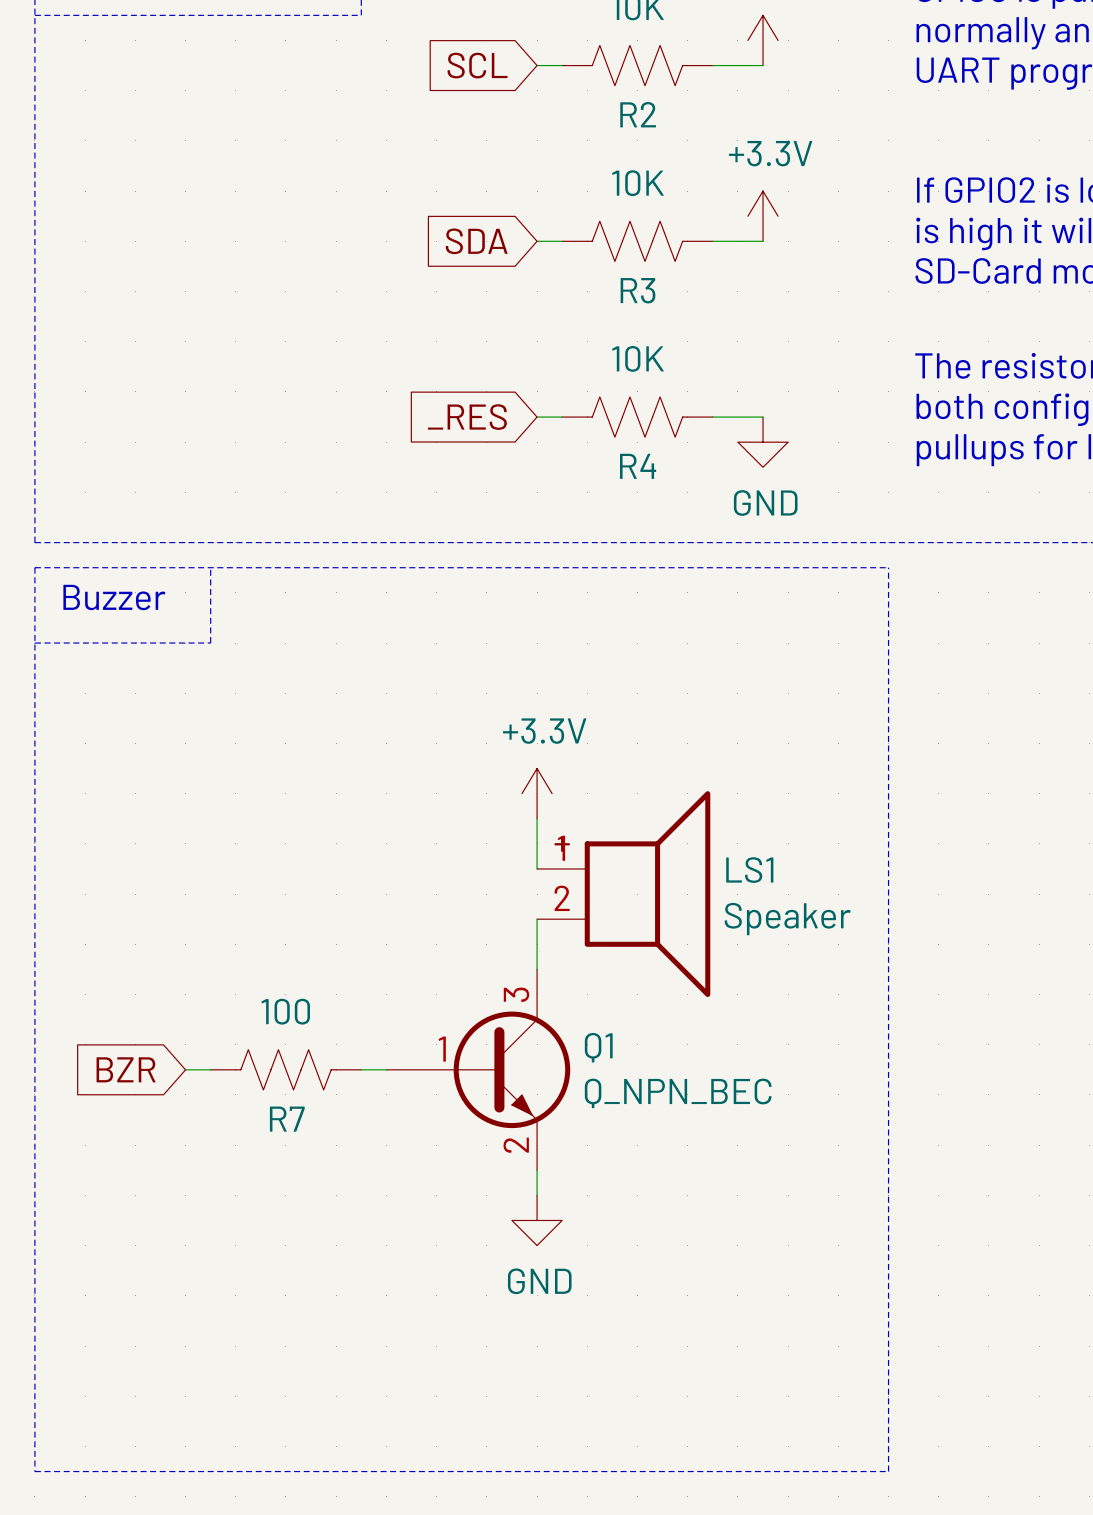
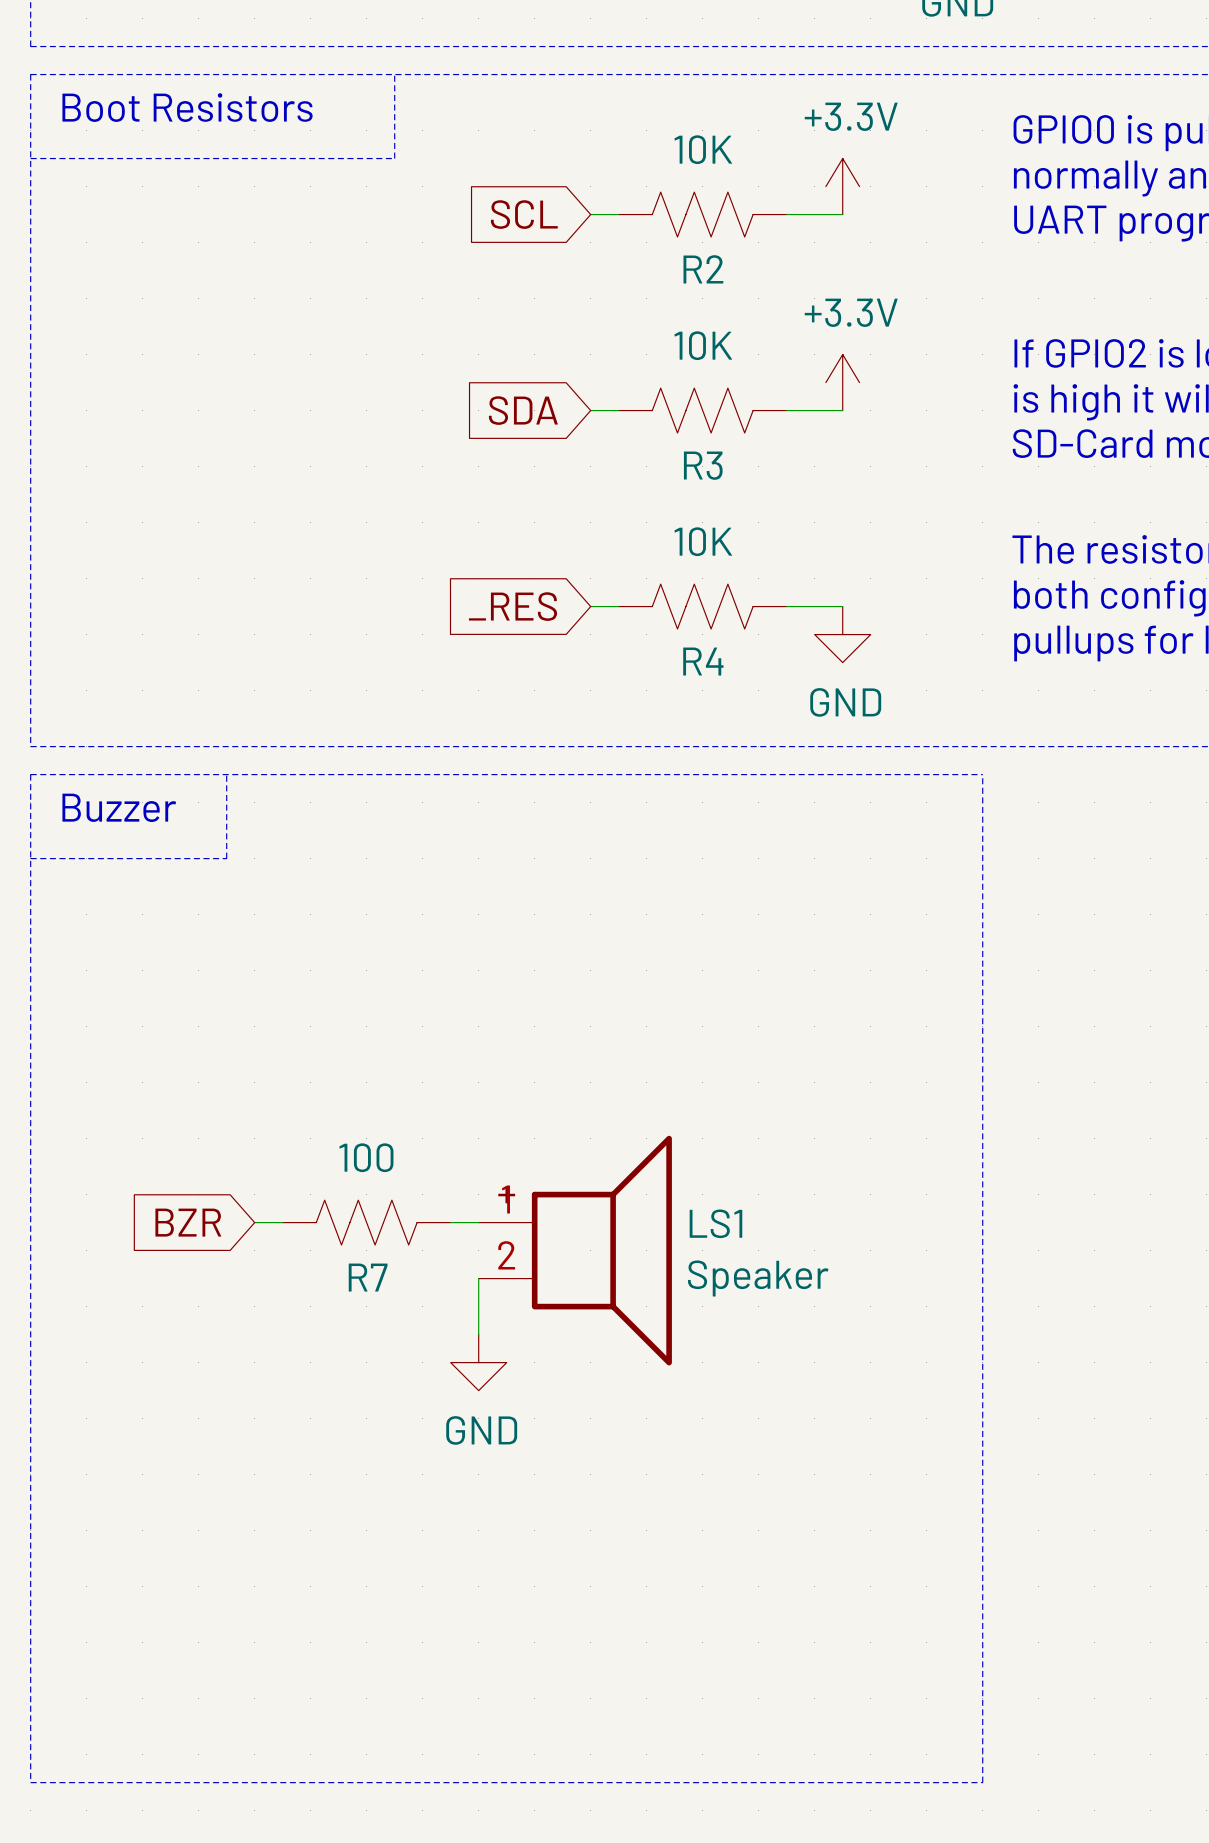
power symbol: +3.3V (537, 793) -> none
wire: (537, 818) (537, 868) -> none
LS1 position: (623, 894) -> (575, 1250)
wire: (537, 919) (537, 969) -> (478, 1278) (478, 1334)
global label position: BZR (126, 1069) -> BZR (188, 1222)
wire: (185, 1069) (210, 1069) -> (254, 1222) (282, 1222)
R7 position: (285, 1069) -> (366, 1222)
wire: (361, 1069) (386, 1069) -> (450, 1222) (478, 1222)
Q1: Q_NPN_BEC (478, 1069) -> none
wire: (537, 1170) (537, 1195) -> none
power symbol position: GND (537, 1220) -> GND (478, 1362)

